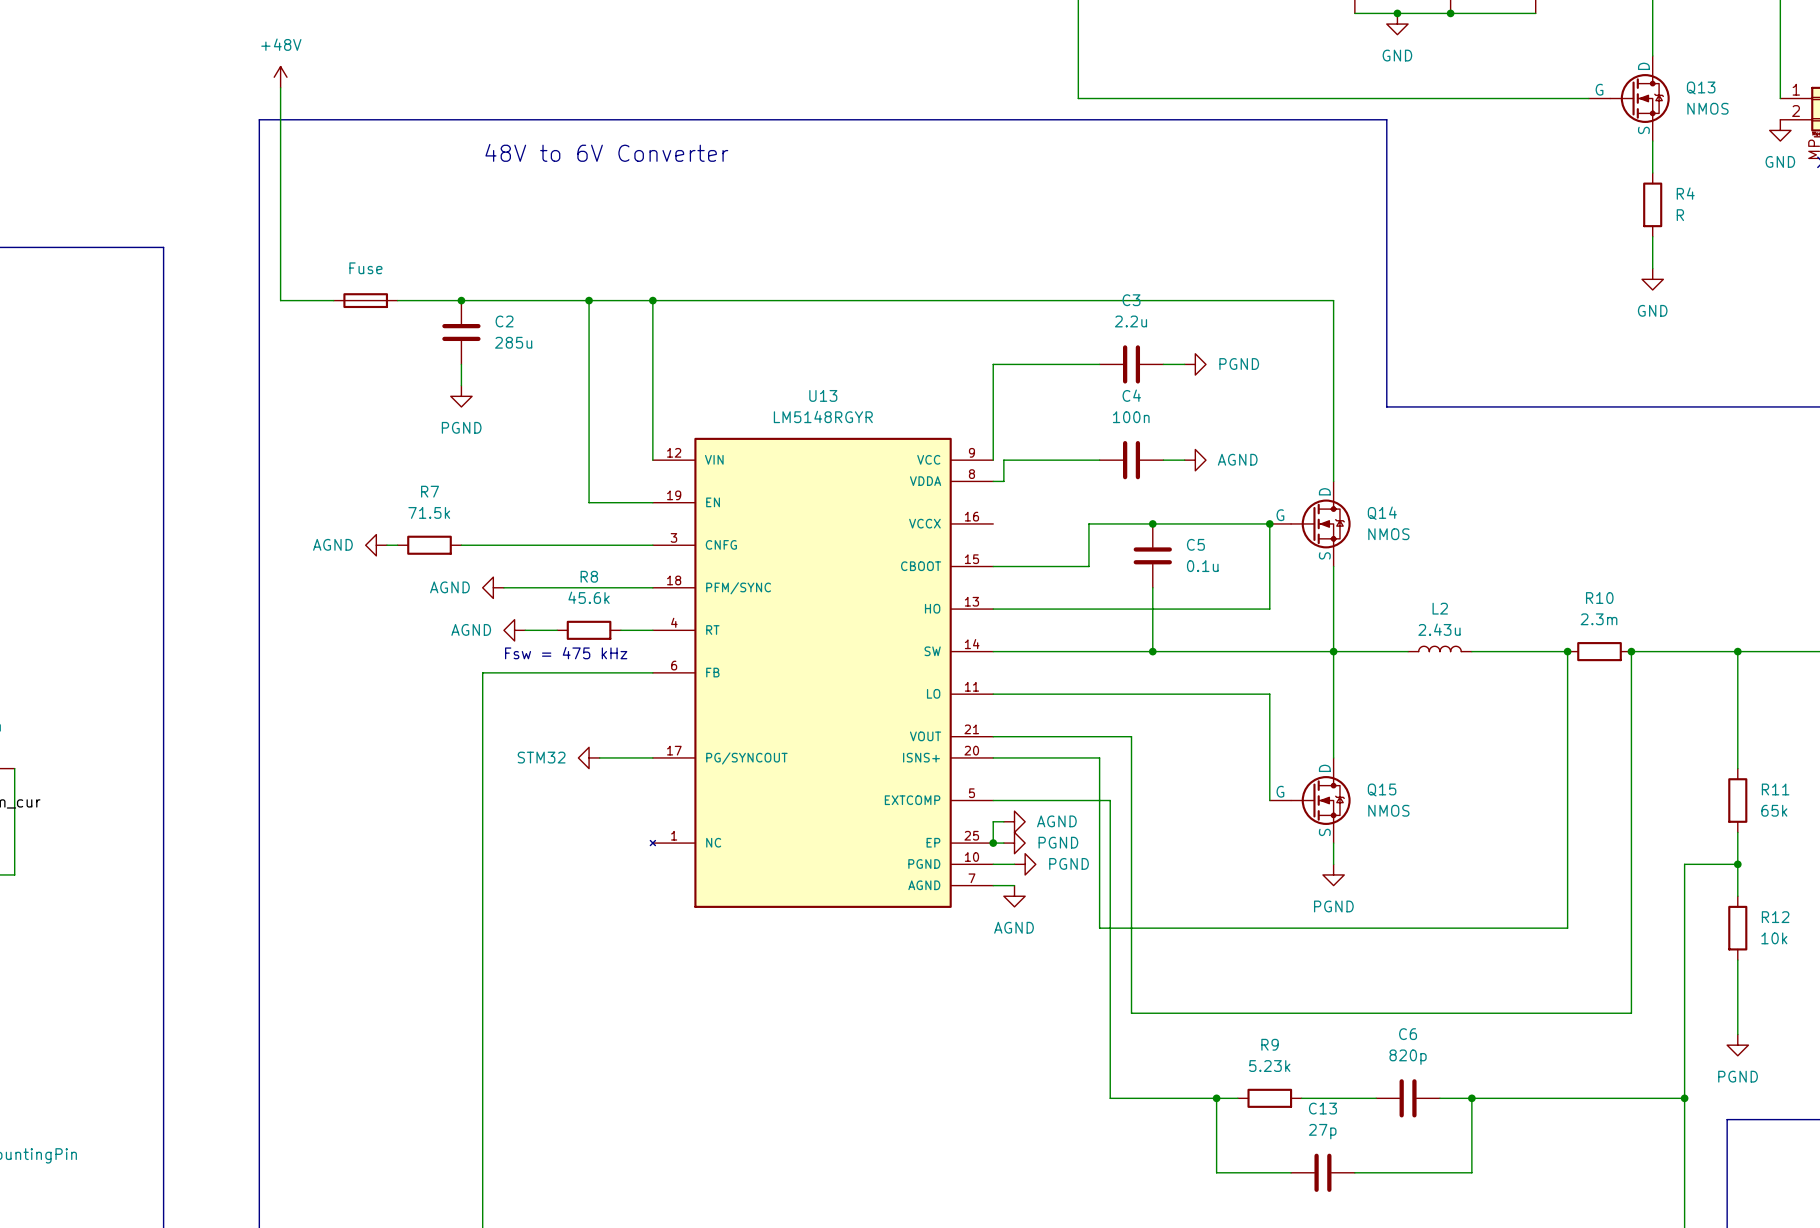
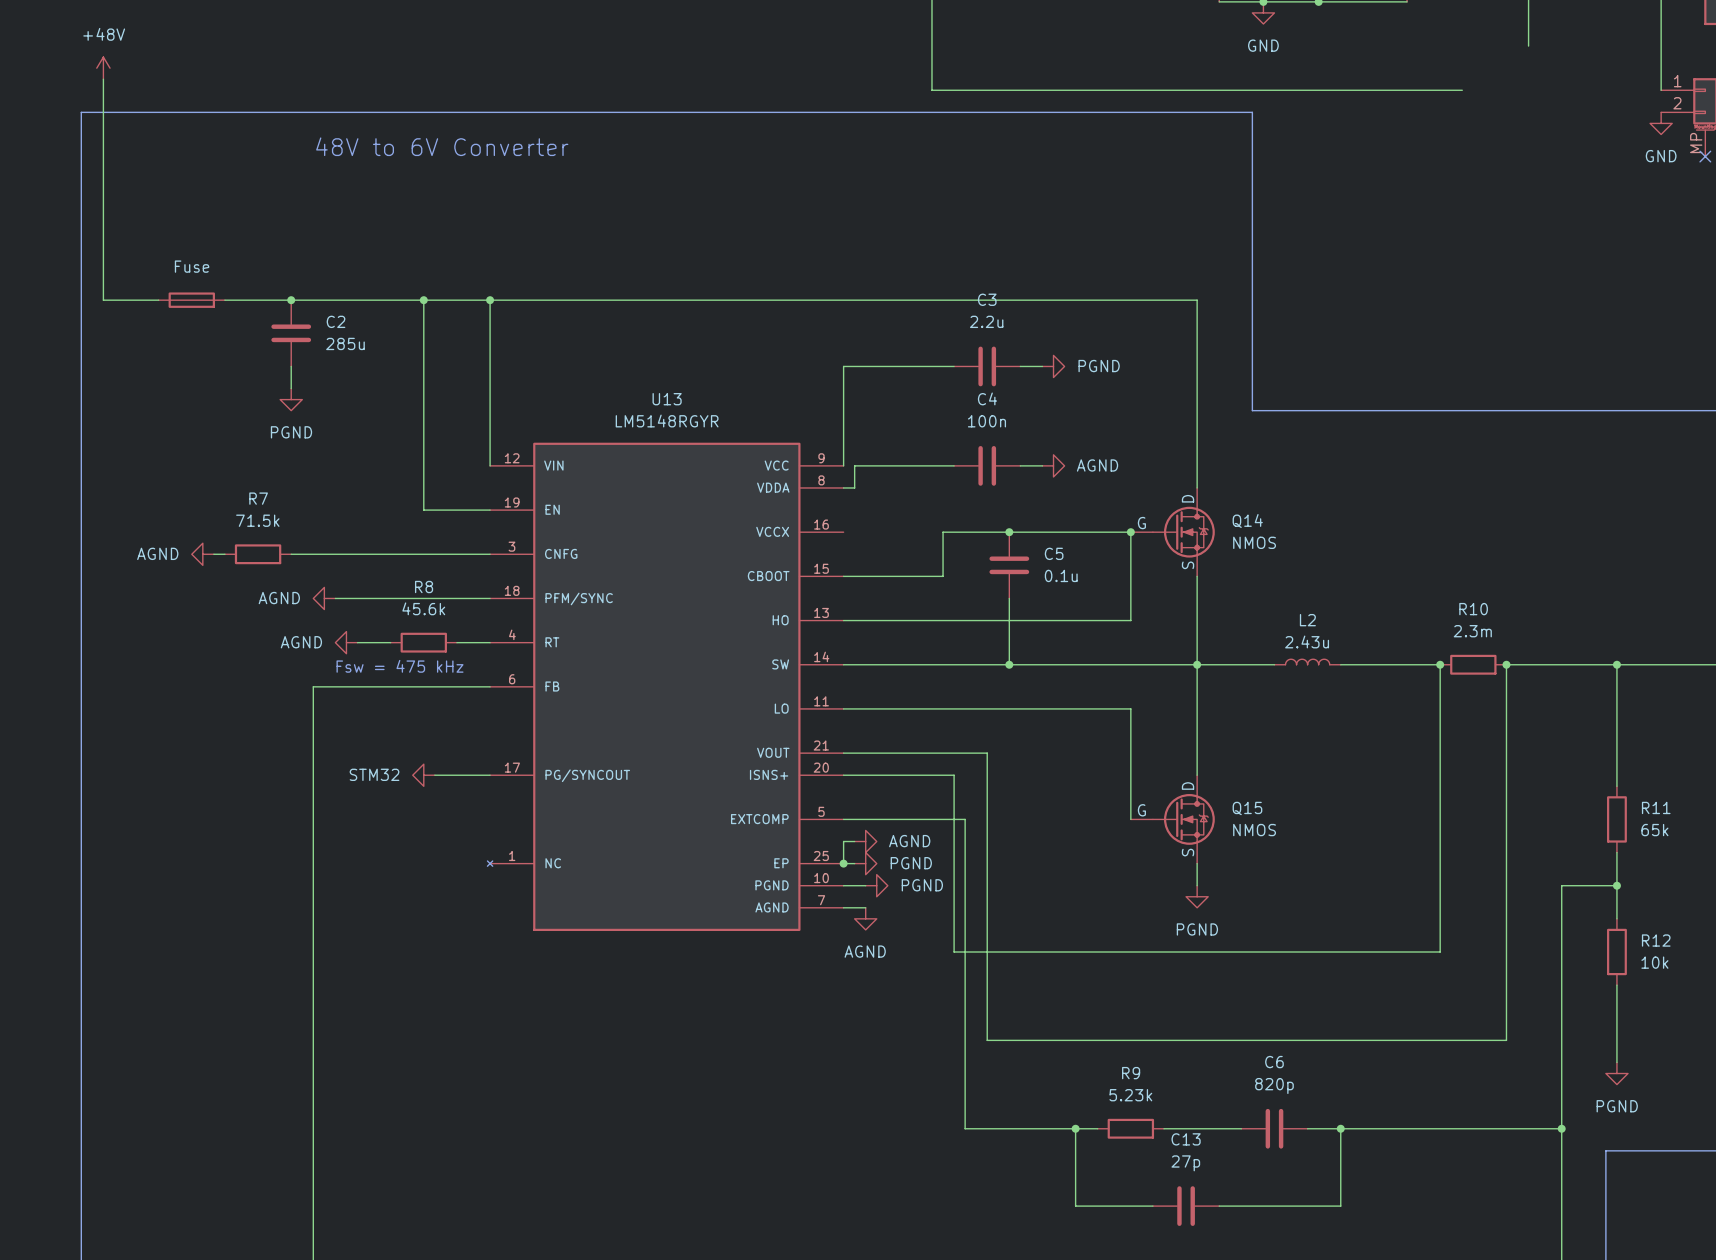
Q13: NMOS (1629, 98) -> none
wire: (1652, 141) (1652, 172) -> none
R4: R (1652, 204) -> none
wire: (1652, 236) (1652, 268) -> none
power symbol: GND (1652, 279) -> none

